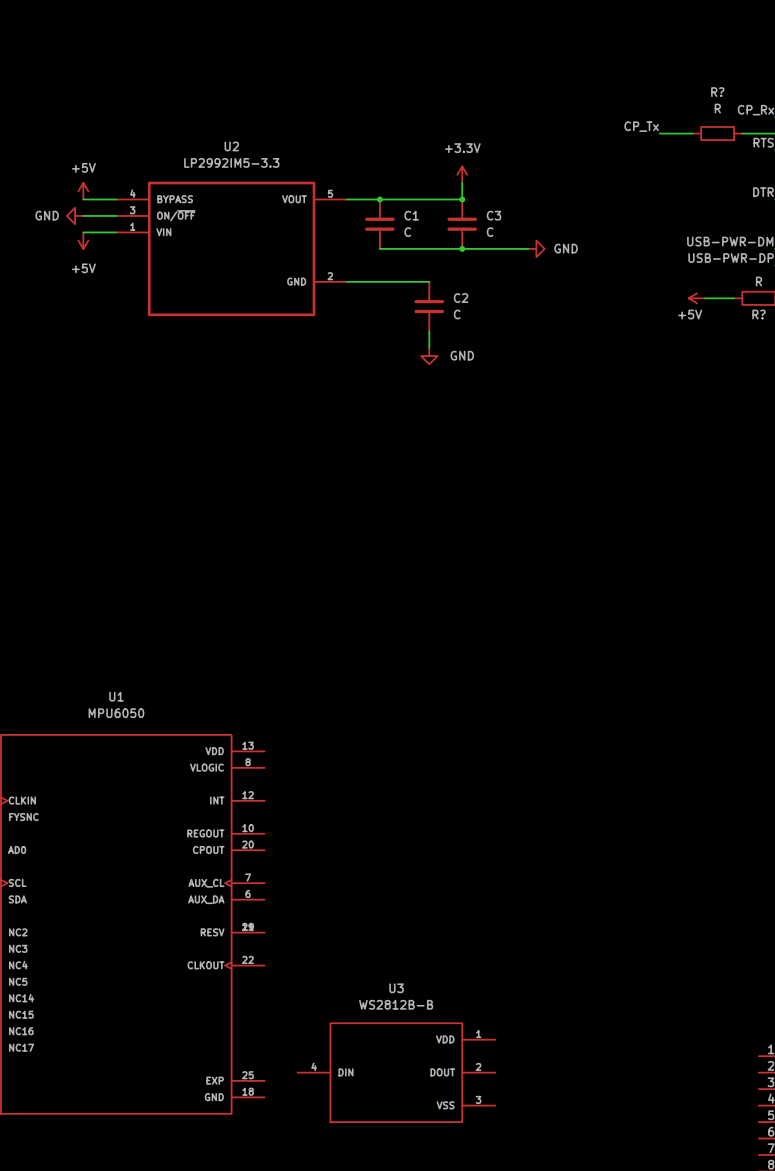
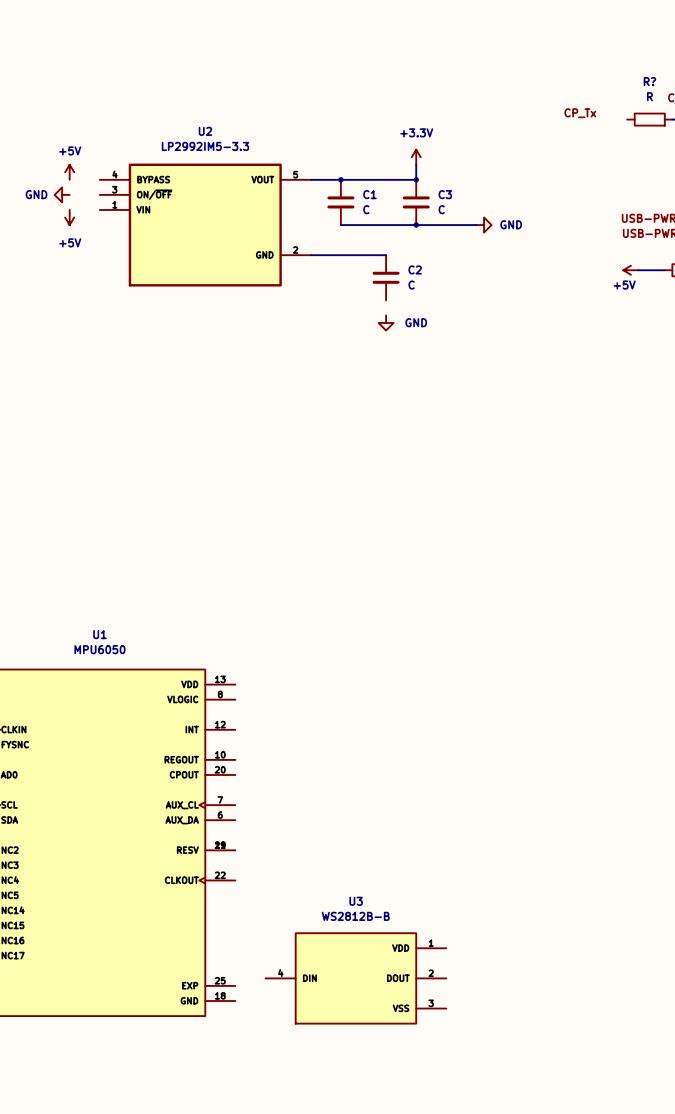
wire: (659, 133) (692, 133) -> none
wire: (83, 199) (116, 199) -> none
wire: (83, 215) (116, 215) -> none
wire: (83, 232) (116, 232) -> none
wire: (429, 331) (429, 347) -> none

